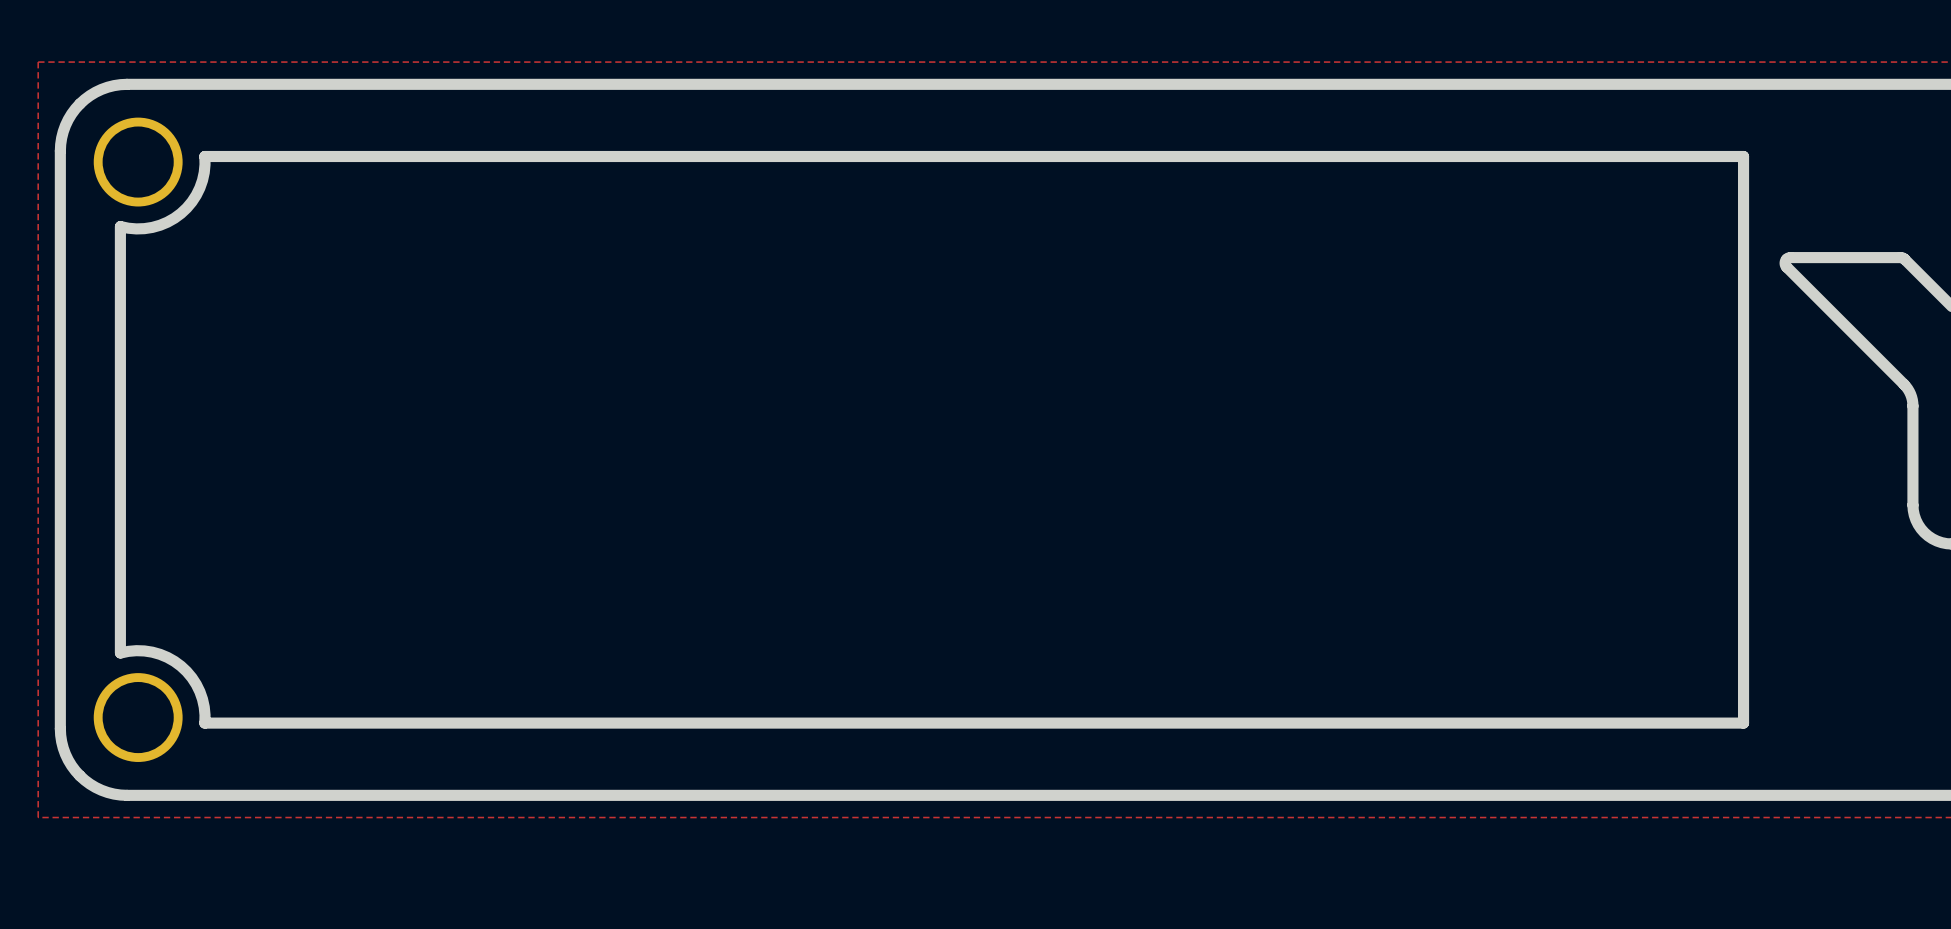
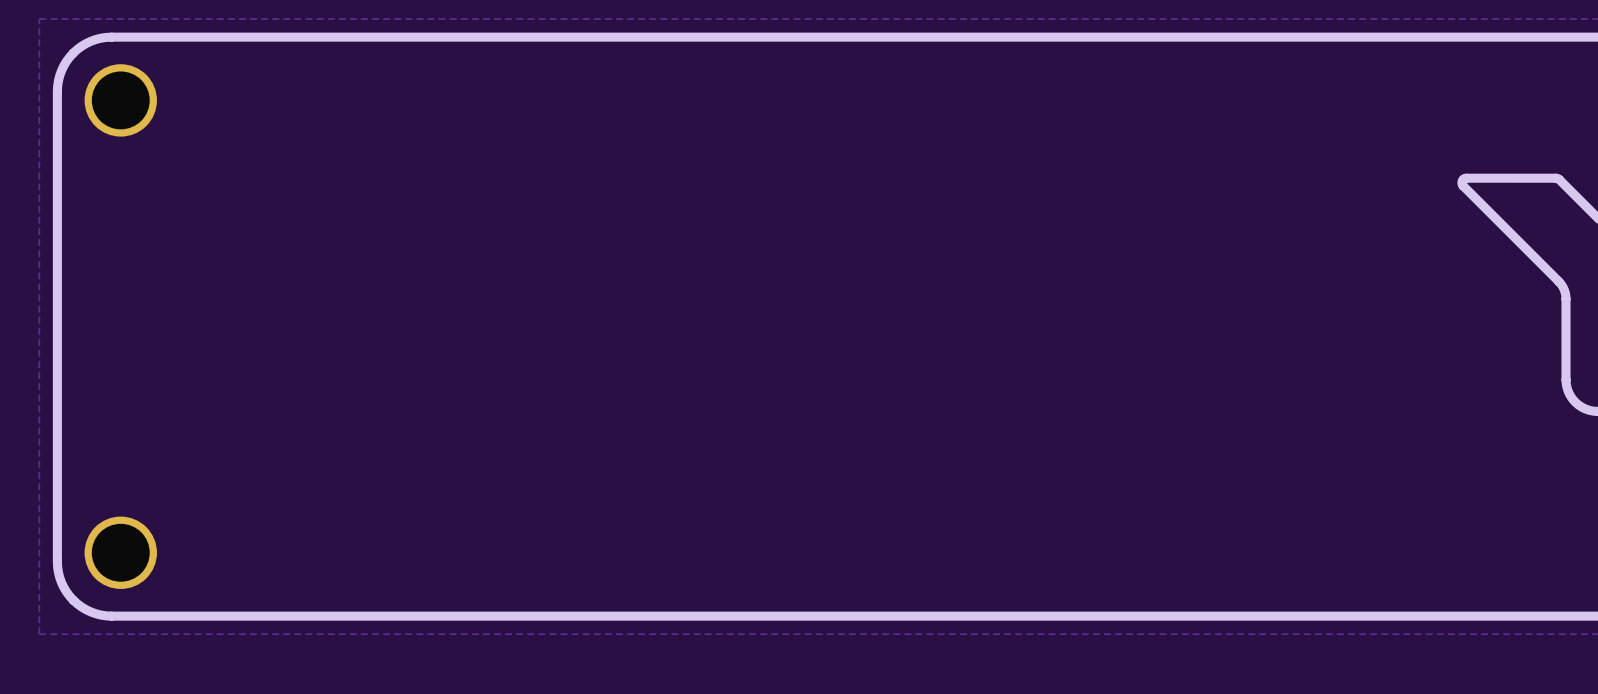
board edge: (120, 226) (120, 653) -> none
board edge: (120, 226) (136, 228) (152, 227) (167, 222) (180, 213) (191, 201) (199, 187) (204, 172) (204, 156) (1743, 156) (1743, 723) (204, 723) (204, 707) (199, 691) (191, 677) (180, 666) (167, 657) (152, 652) (136, 650) (120, 653) -> none

